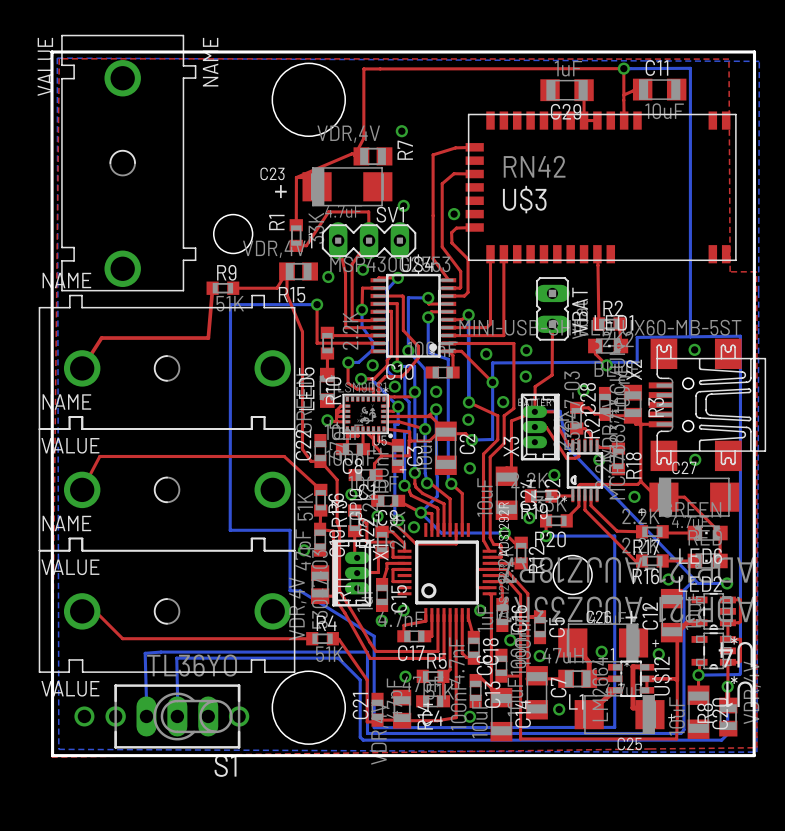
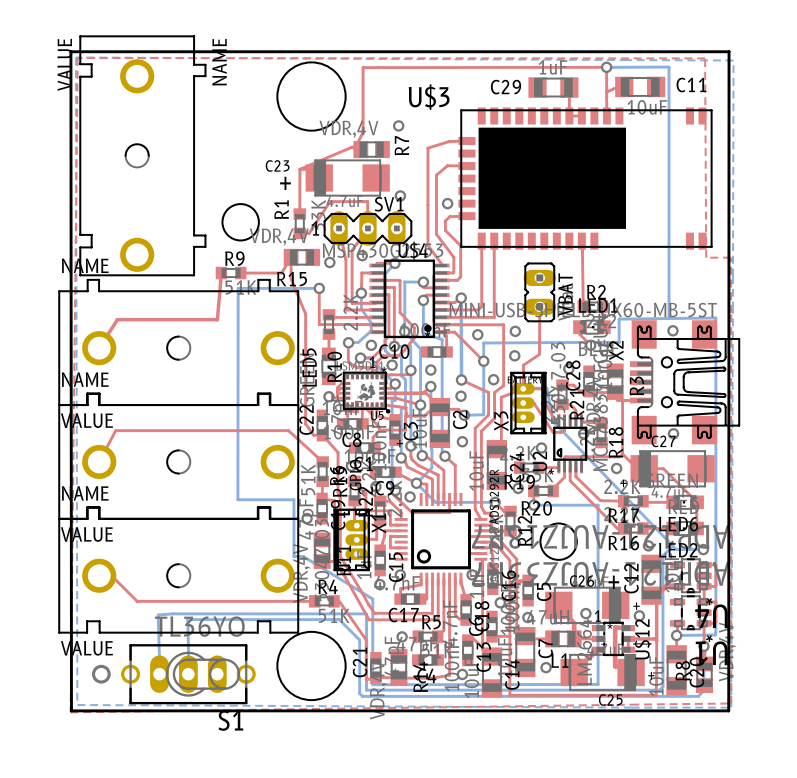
C11 name position: C11 (657, 68) -> C11 (691, 85)
C29 name position: C29 (566, 111) -> C29 (506, 87)
drawing: none -> [478, 127, 626, 229]
text position: U$3 (524, 199) -> U$3 (429, 97)

